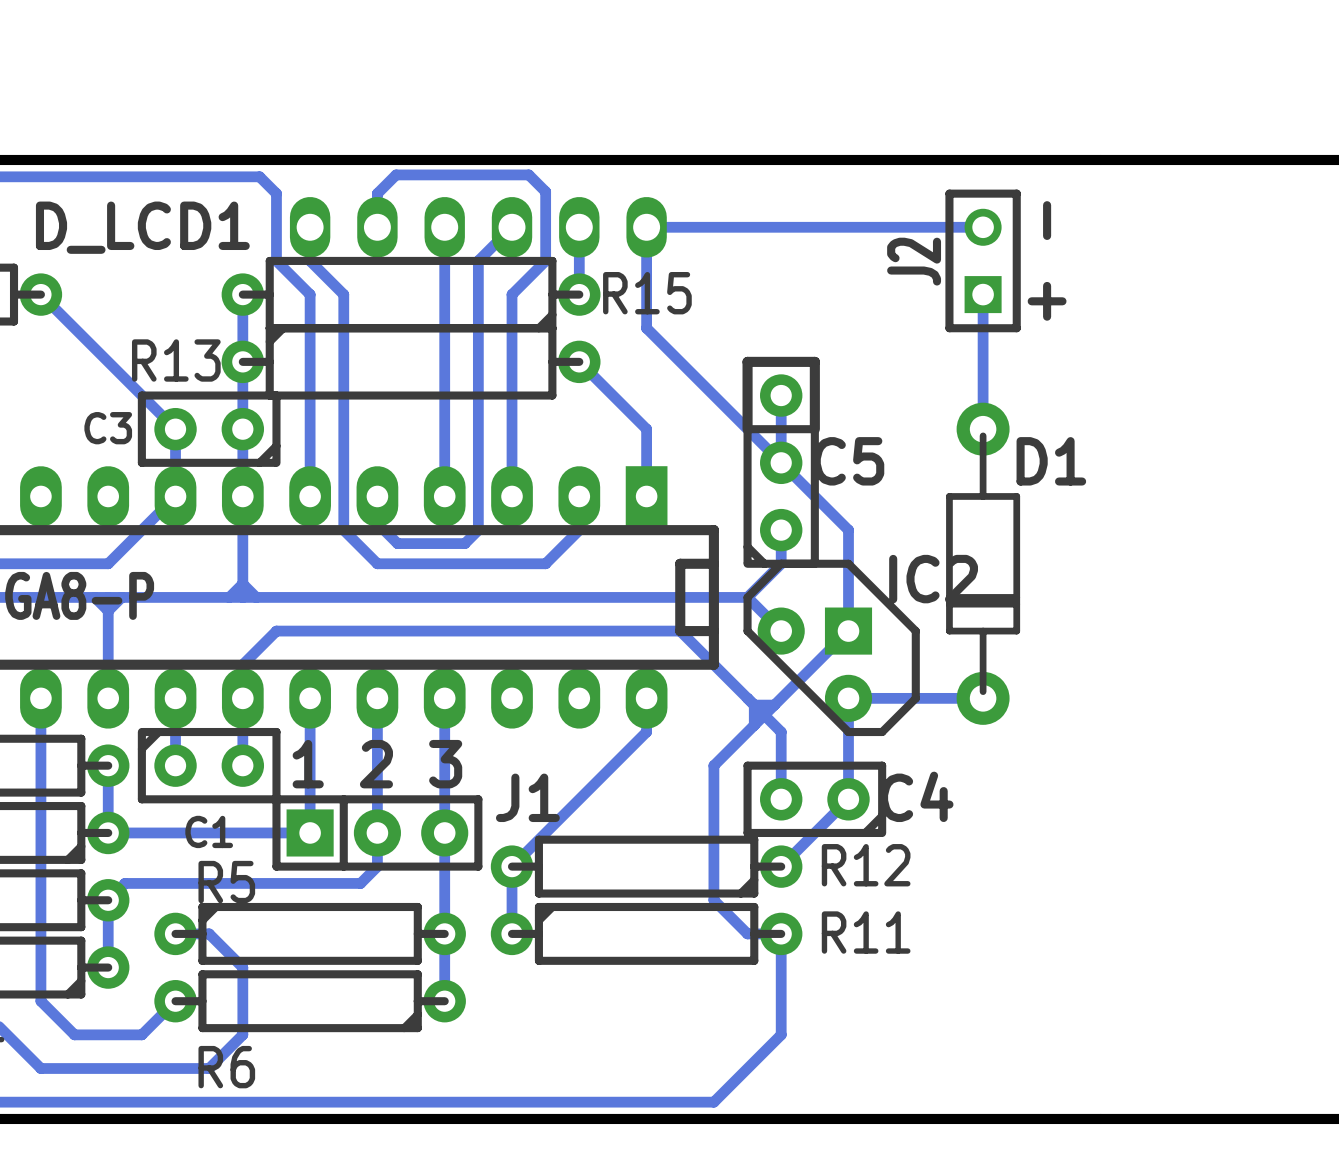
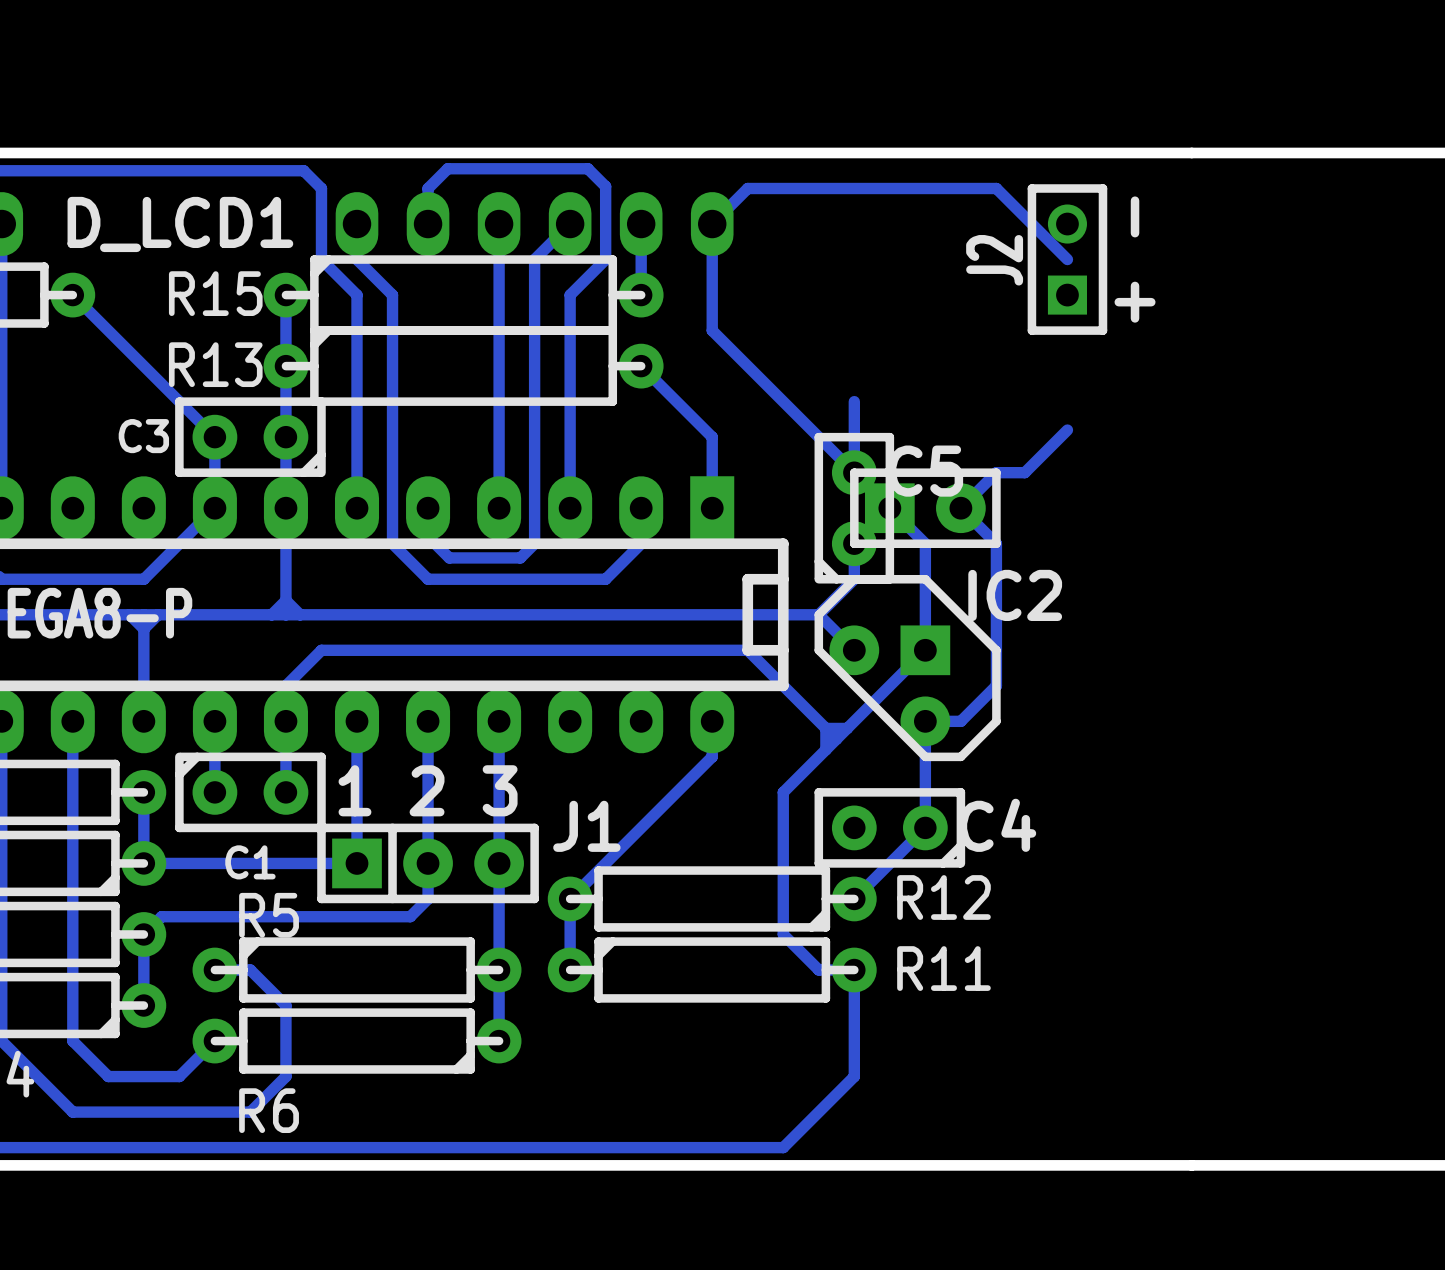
bottom track: (646, 227) (983, 227) -> (712, 224) (747, 188) (996, 188) (1067, 259)
R15 rotation: 0° (411, 294) -> 180° (463, 295)
bottom track: (983, 294) (983, 429) -> none
part: (781, 395) -> none
line: (747, 429) (747, 361) (814, 361) (814, 429) -> none
part: none -> (925, 508)
D1: (983, 563) -> none
bottom track: (882, 698) (983, 698) -> (960, 721) (996, 685) (996, 543) (960, 508) (996, 472) (1024, 472) (1067, 430)
bottom track: (764, 715) (781, 732) (781, 799) -> none

